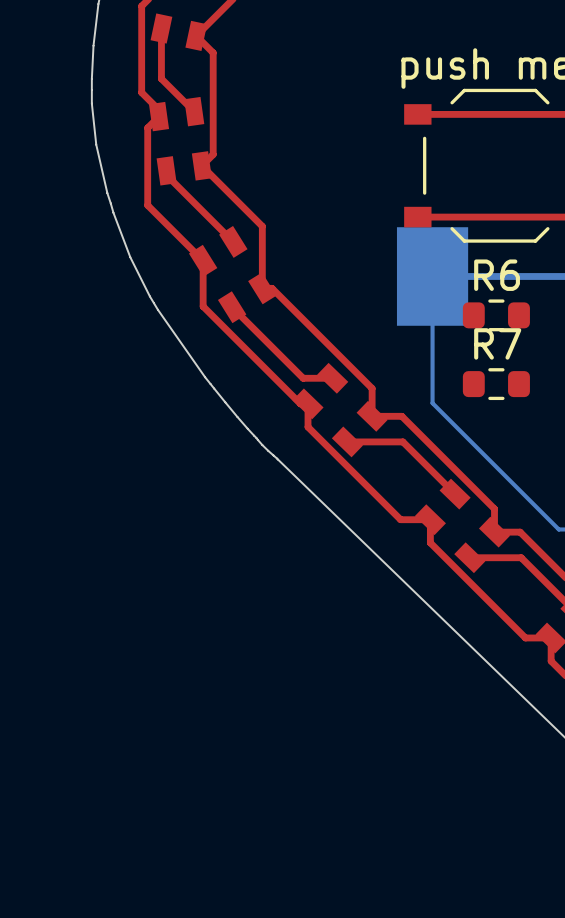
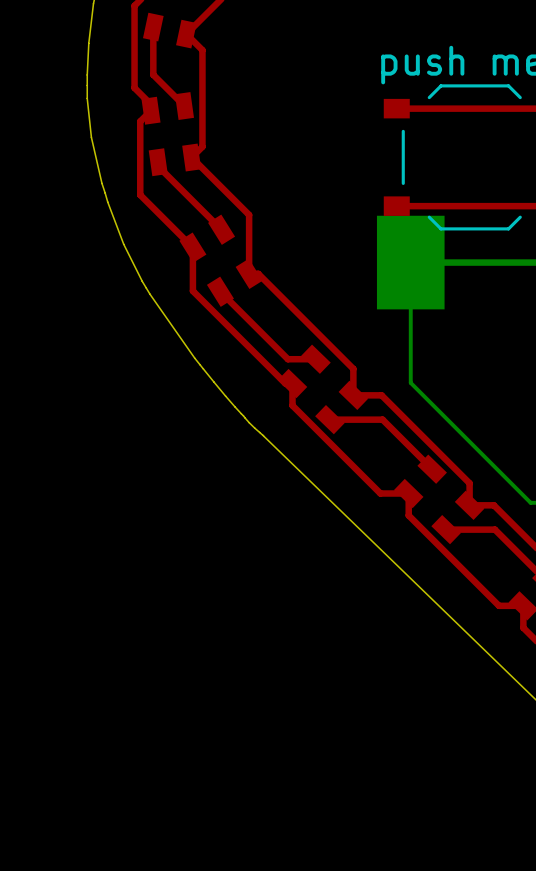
R6: (496, 315) -> none
R7: (496, 384) -> none

